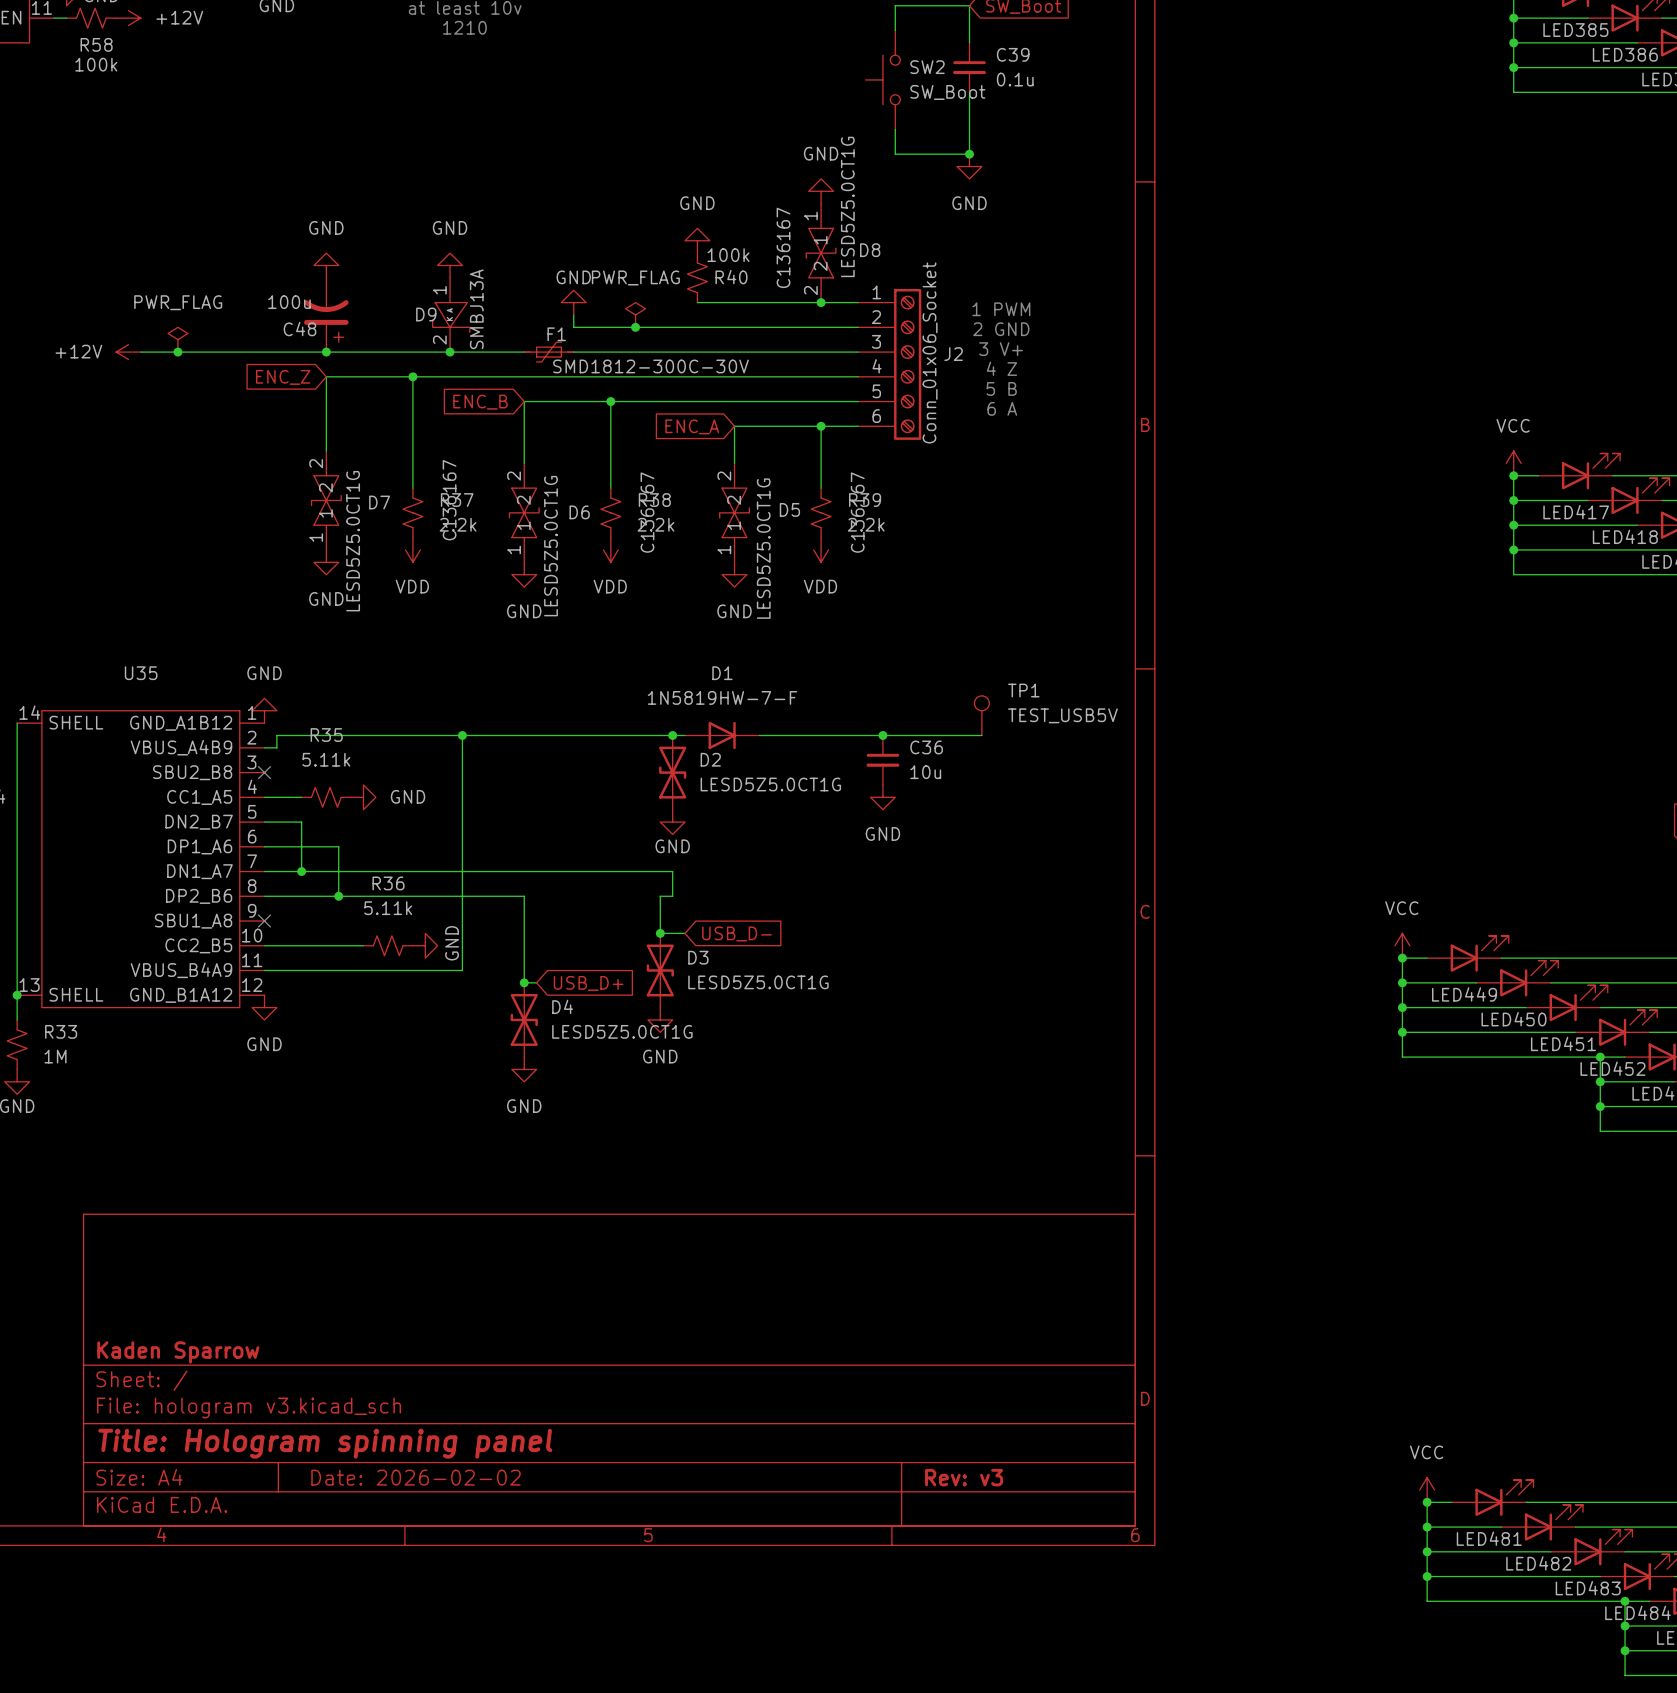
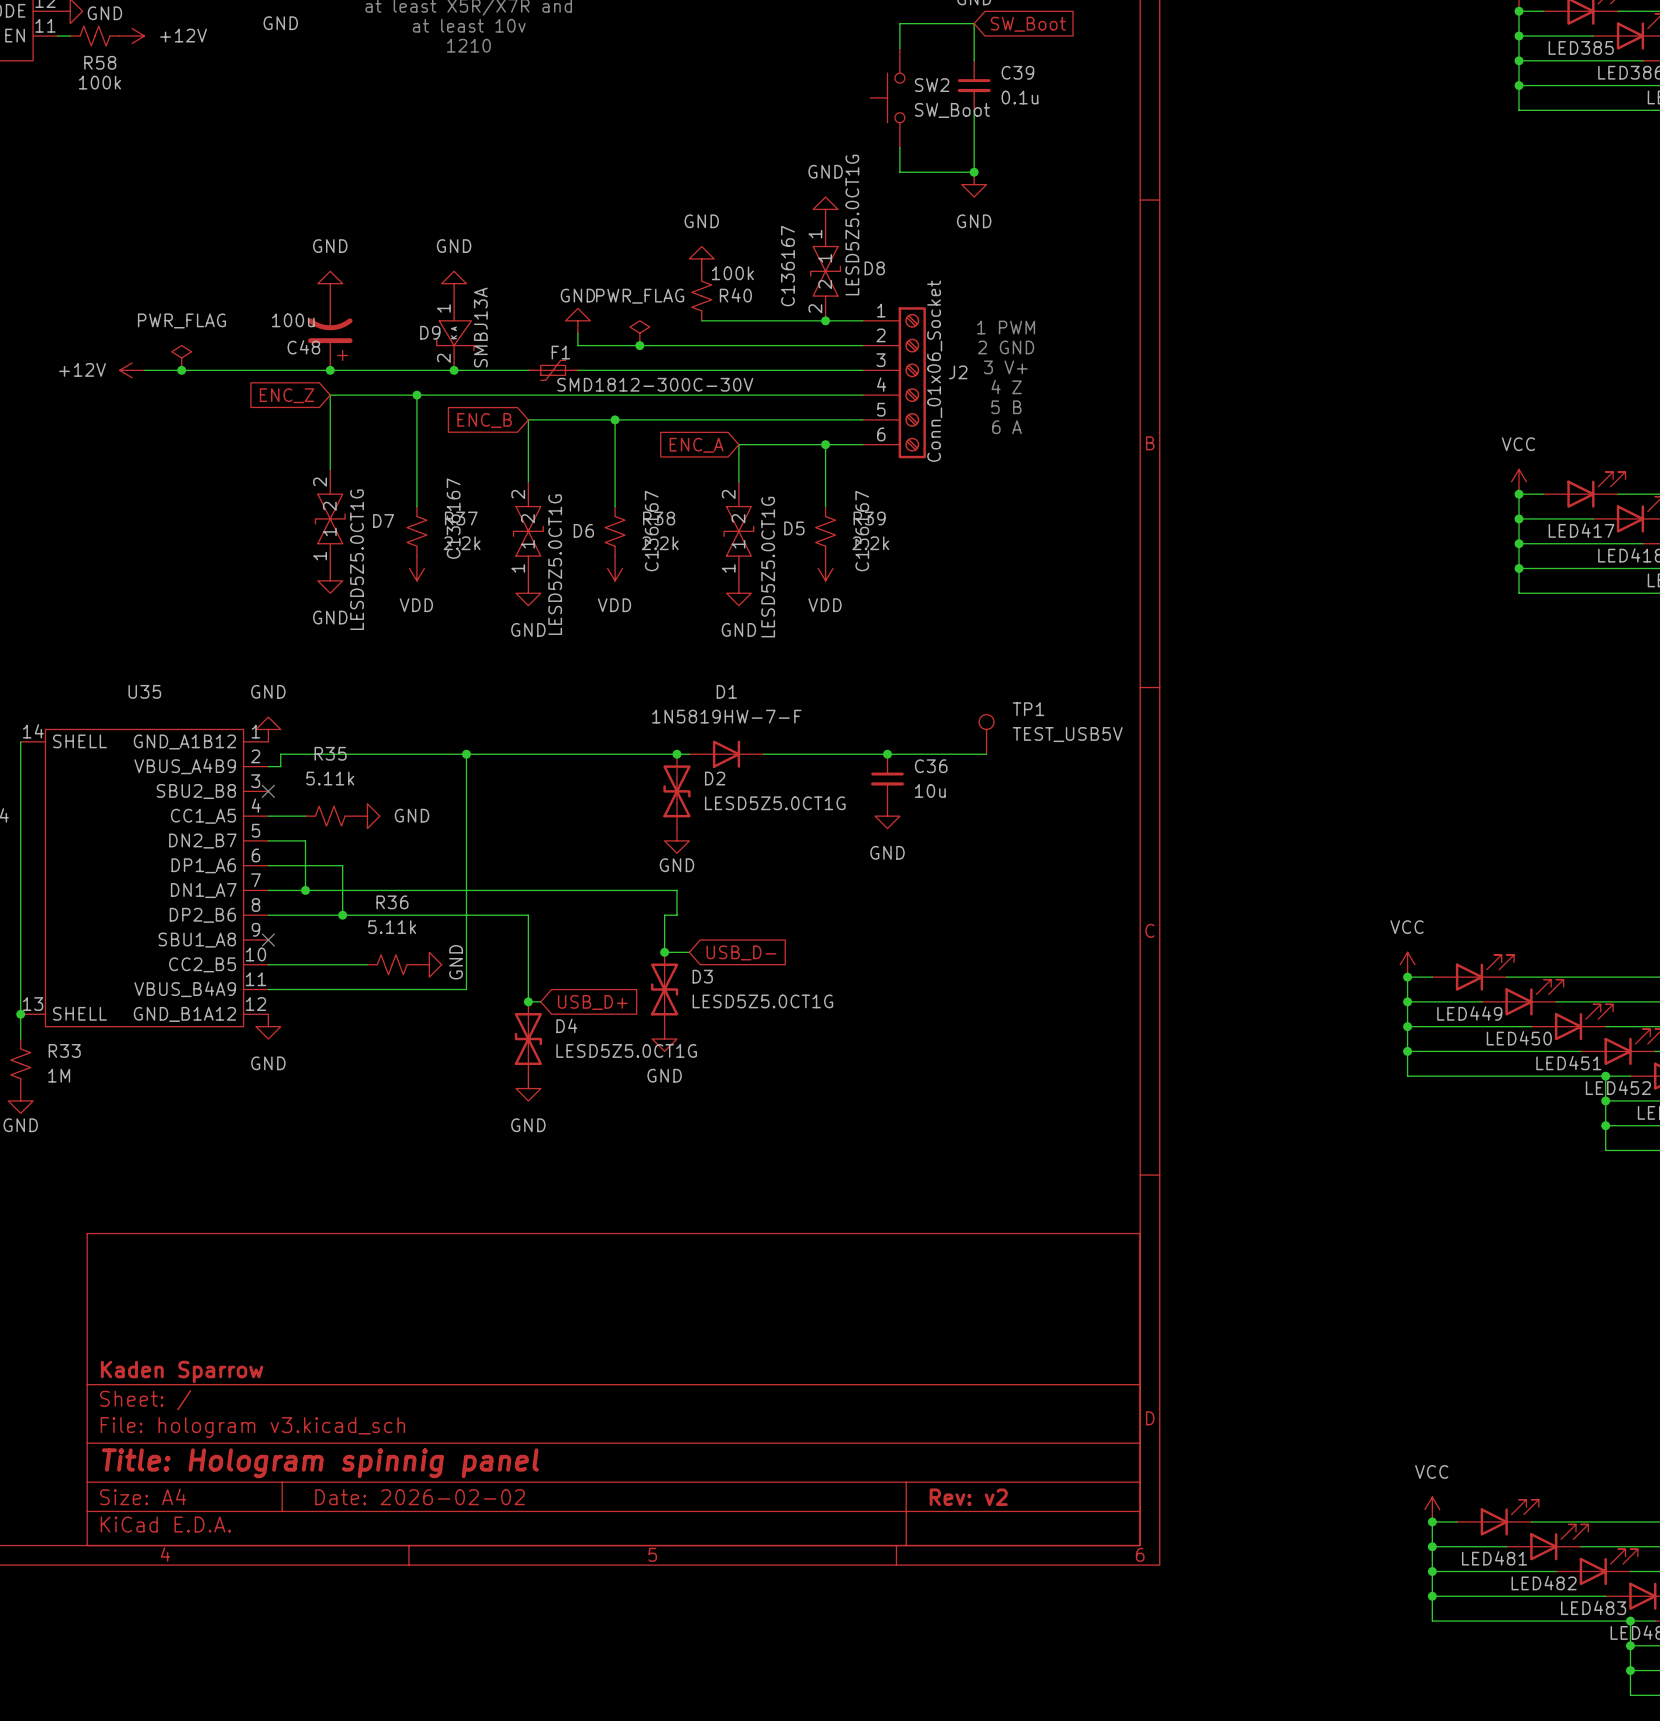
title block: Title: Hologram spinning panel (325, 1443) -> Title: Hologram spinnig panel (320, 1463)
title block: Rev: v3 (964, 1477) -> Rev: v2 (968, 1497)

